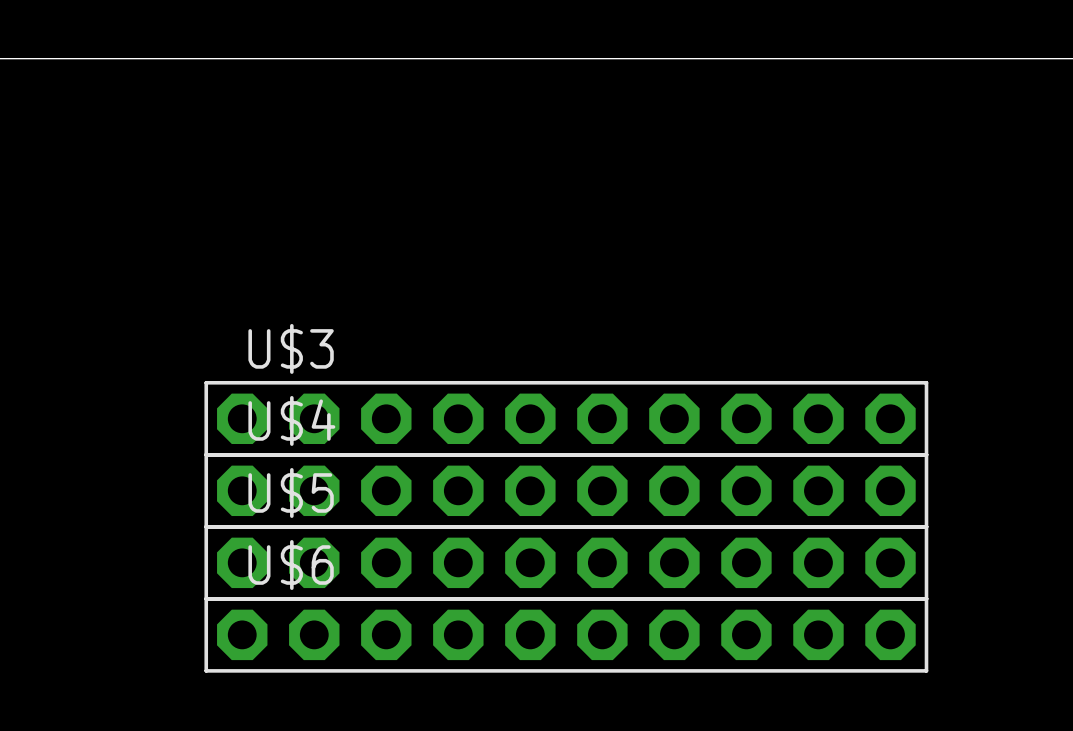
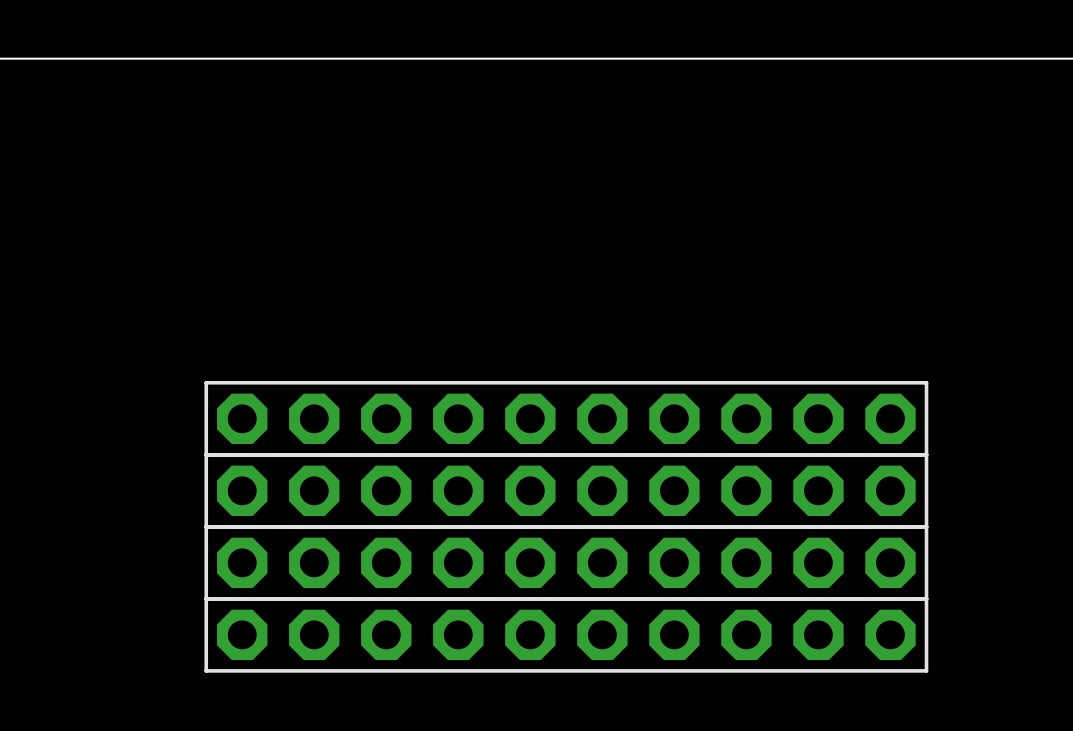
U$3 name: U$3 (291, 348) -> none
U$4 name: U$4 (291, 420) -> none
U$5 name: U$5 (291, 492) -> none
U$6 name: U$6 (291, 565) -> none

